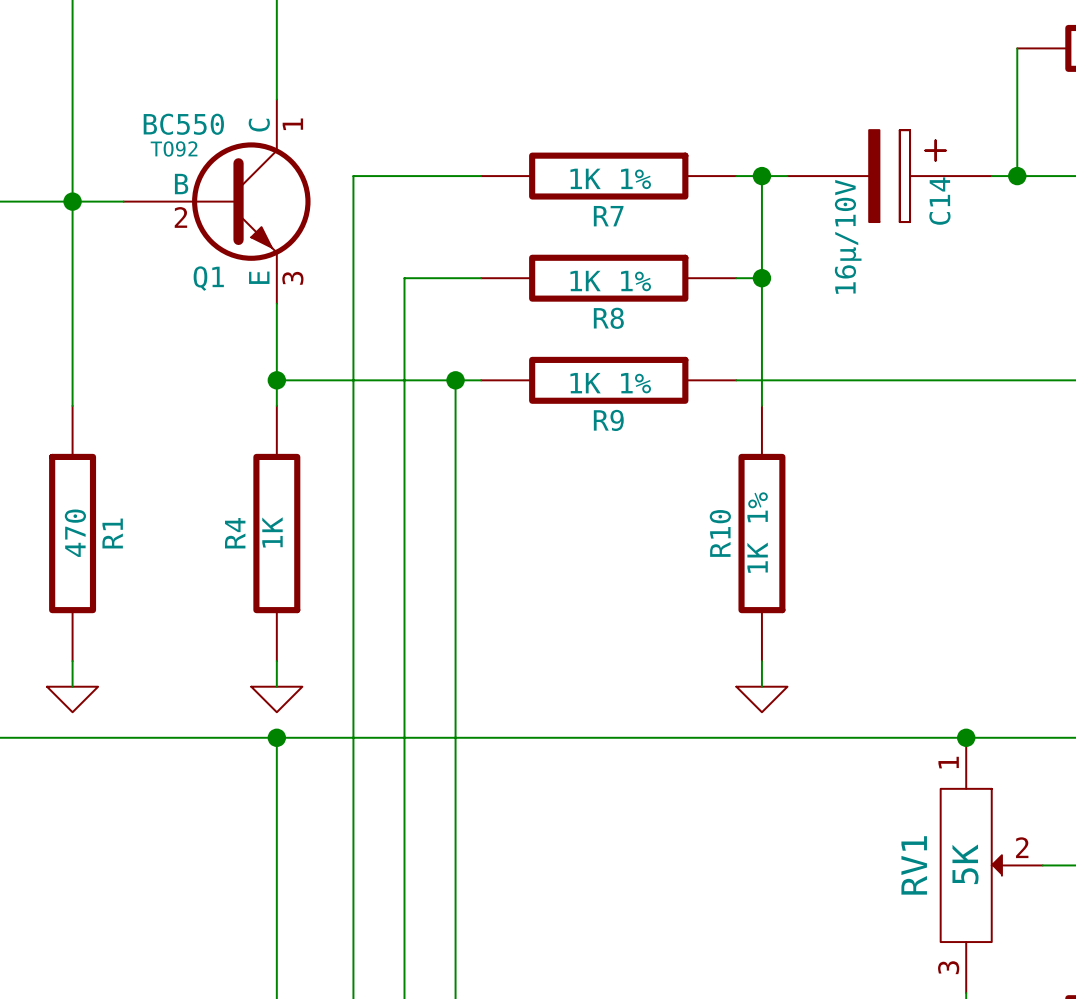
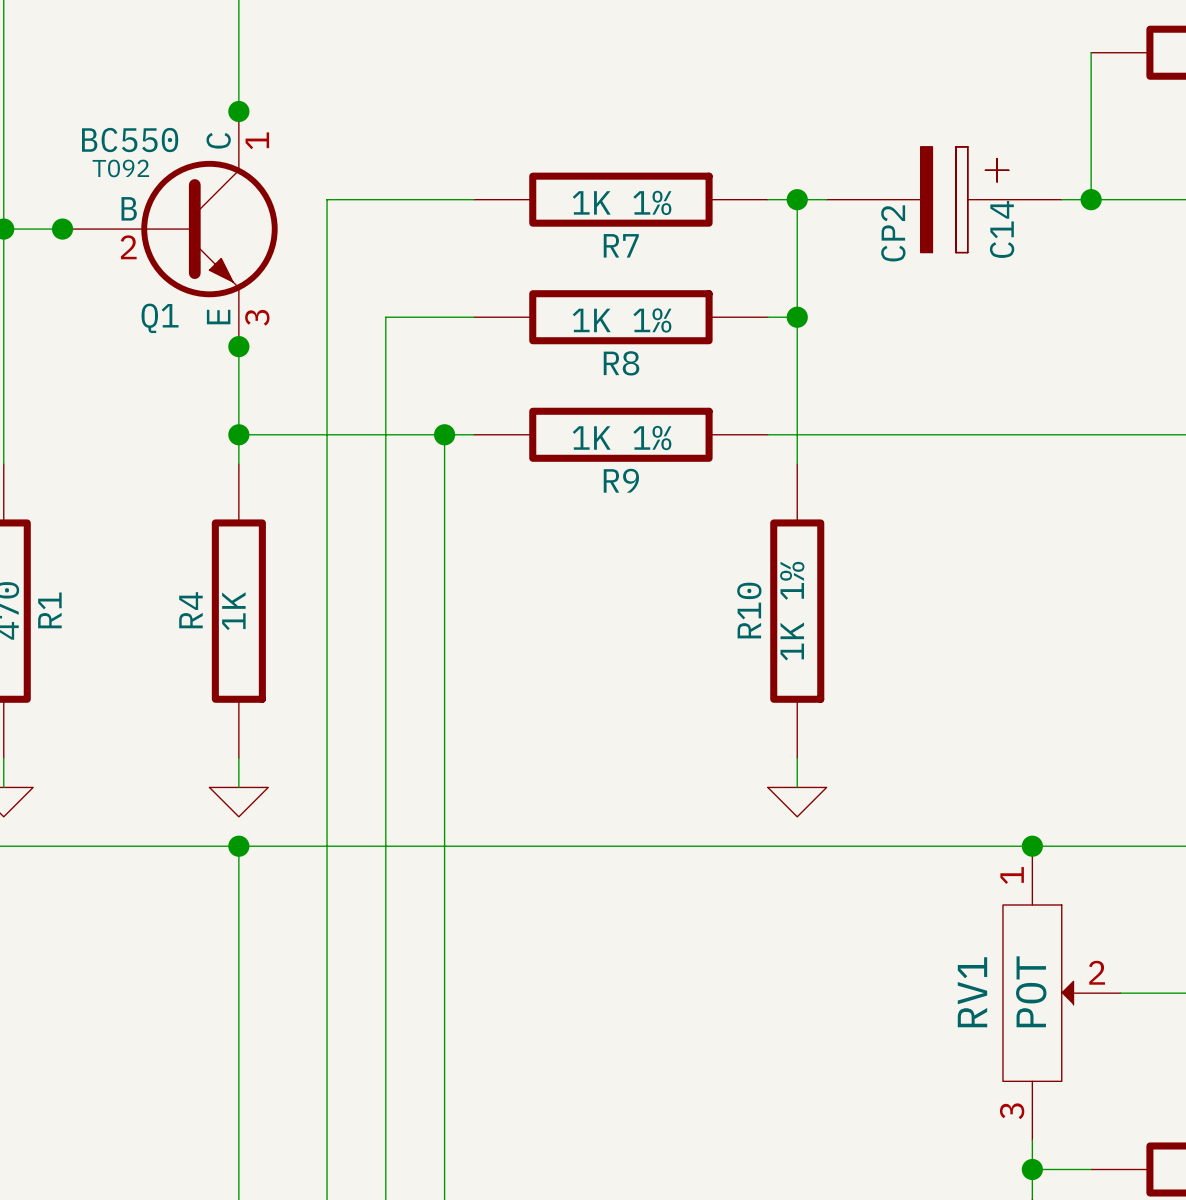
junction: none -> (238, 111)
junction: none -> (62, 229)
C14 value: 16µ/10V (848, 236) -> CP2 (893, 233)
junction: none -> (238, 346)
RV1 value: 5K (965, 864) -> POT (1031, 991)

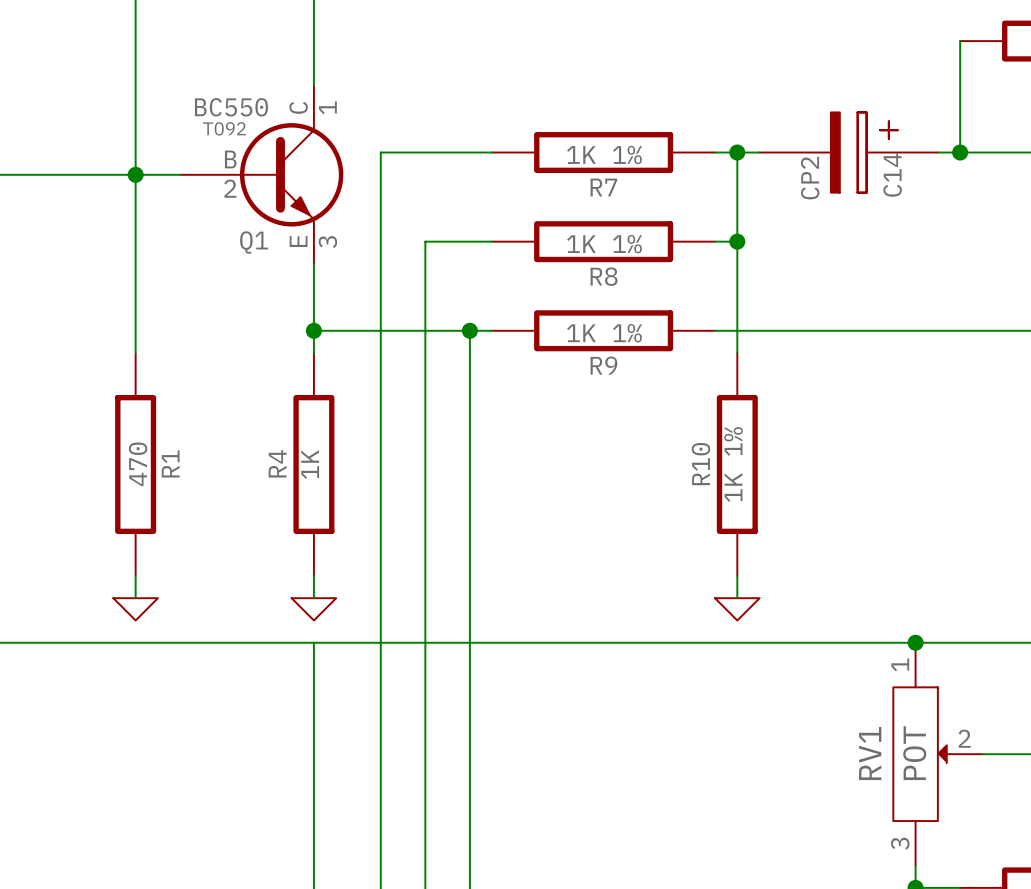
junction: (238, 111) -> none
junction: (62, 229) -> none
junction: (238, 346) -> none
junction: (238, 846) -> none

